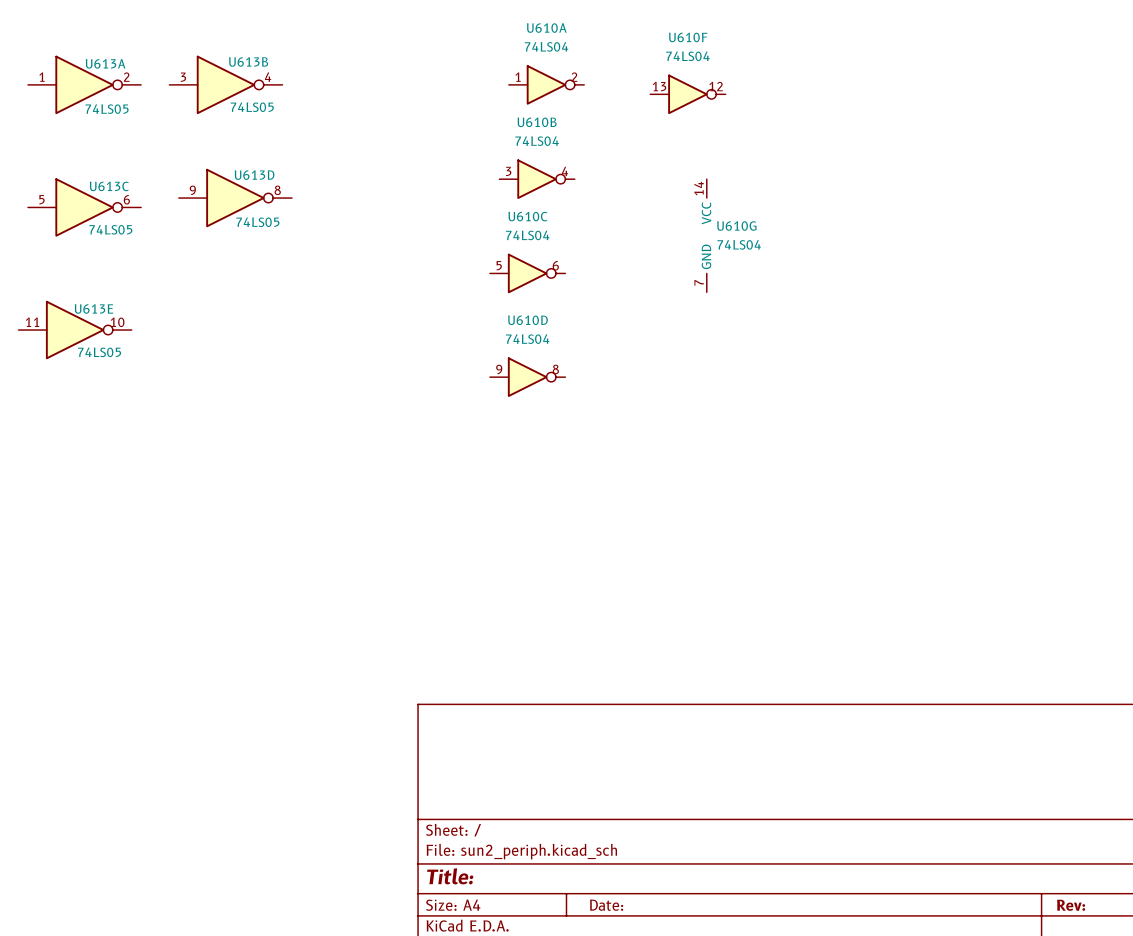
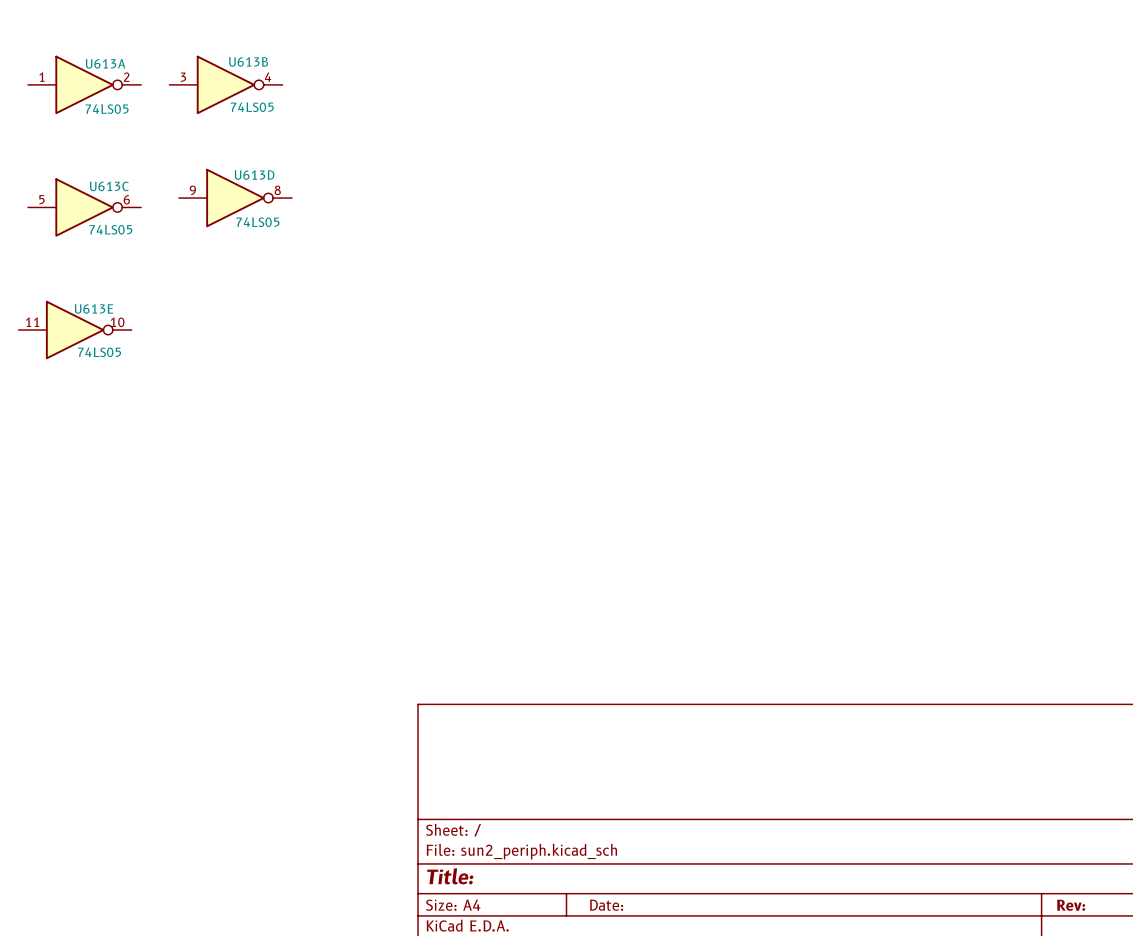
U610A: 74LS04 (546, 84) -> none
U610F: 74LS04 (687, 94) -> none
U610B: 74LS04 (537, 179) -> none
U610G: 74LS04 (706, 235) -> none
U610C: 74LS04 (527, 273) -> none
U610D: 74LS04 (527, 377) -> none

